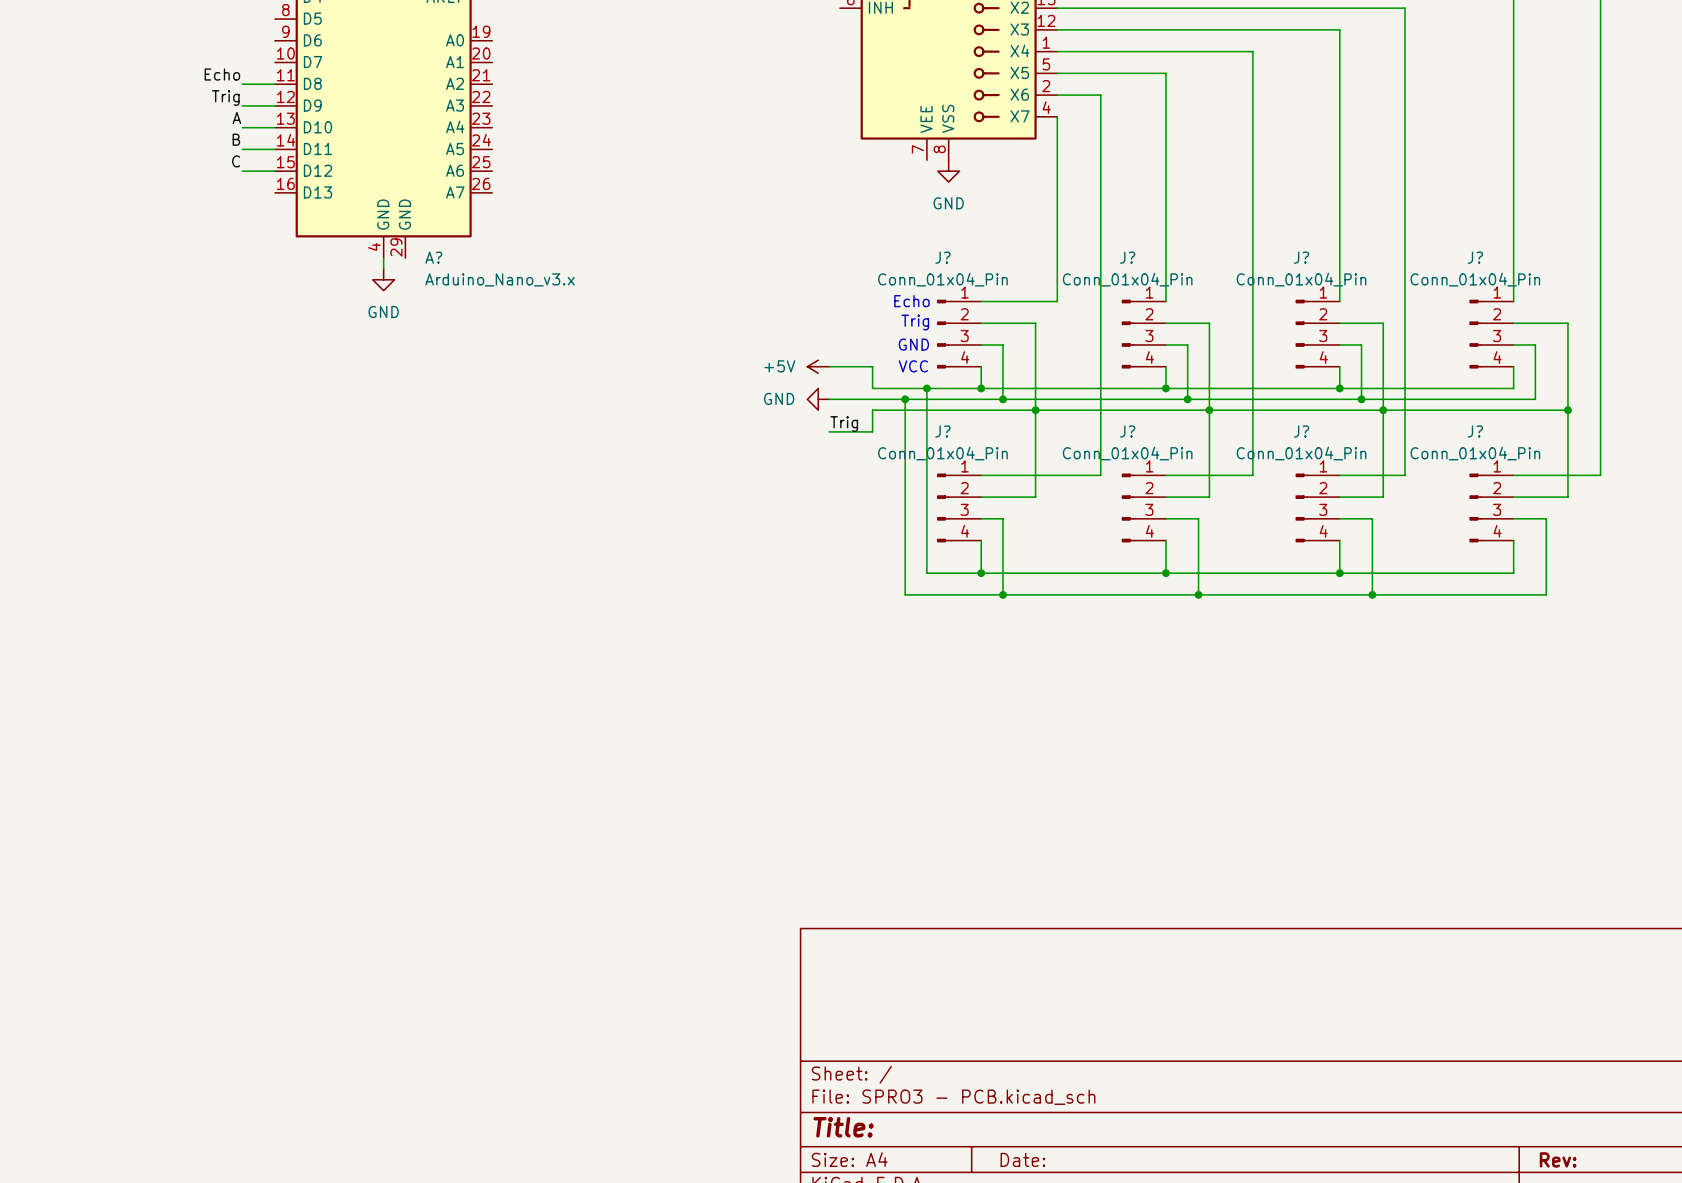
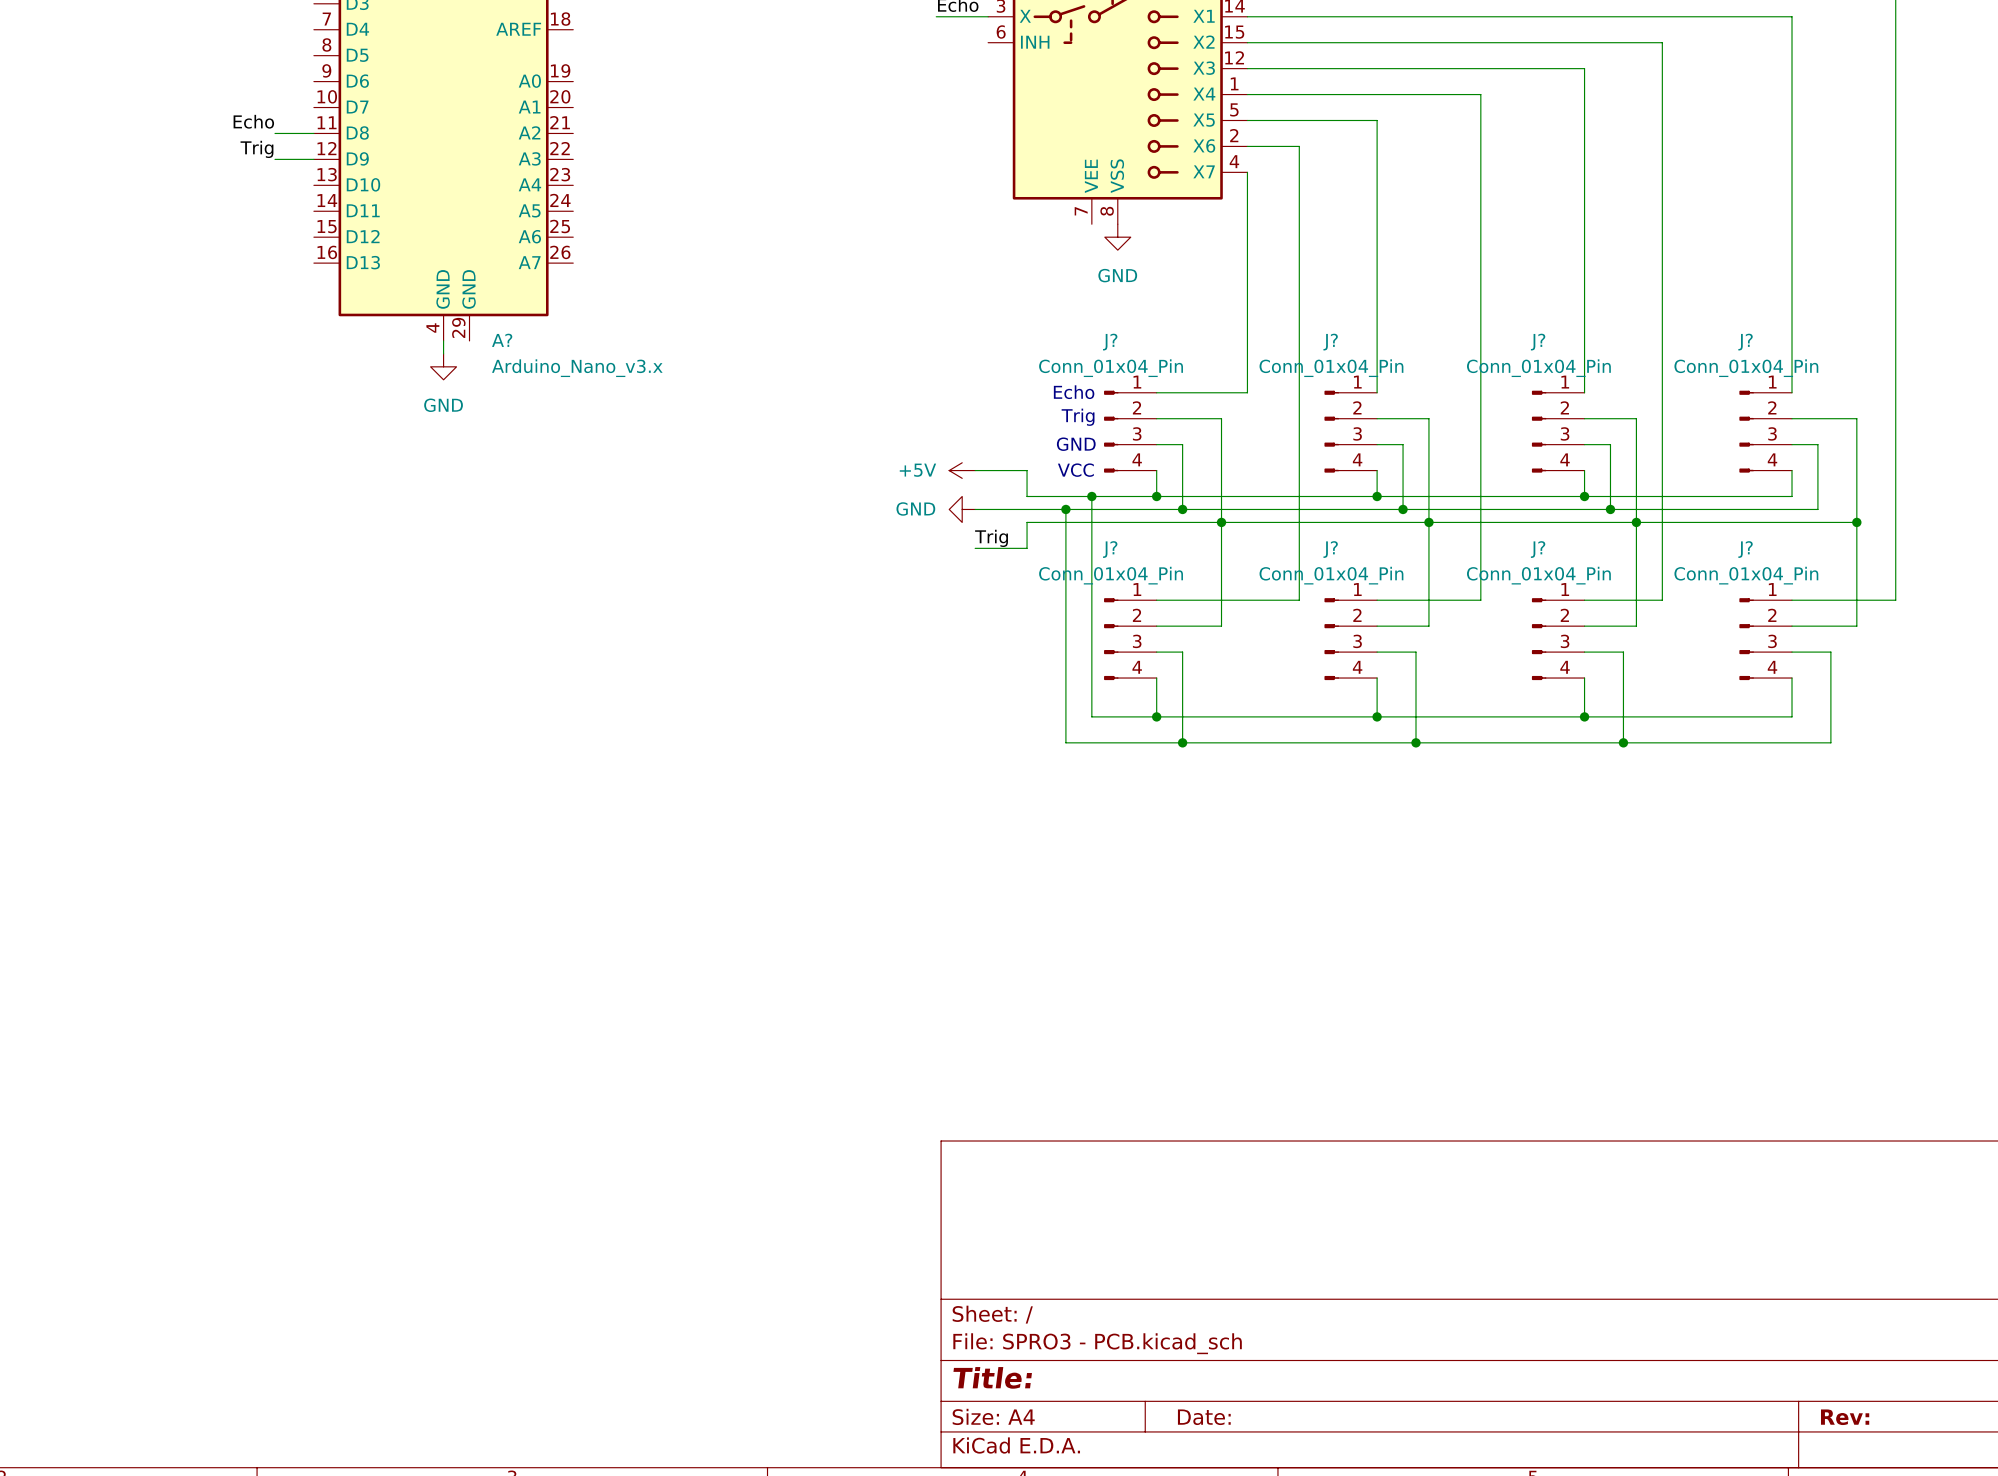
label: A (236, 117) -> none
wire: (242, 127) (275, 127) -> none
label: B (236, 139) -> none
wire: (242, 149) (275, 149) -> none
label: C (236, 161) -> none
wire: (242, 171) (275, 171) -> none

